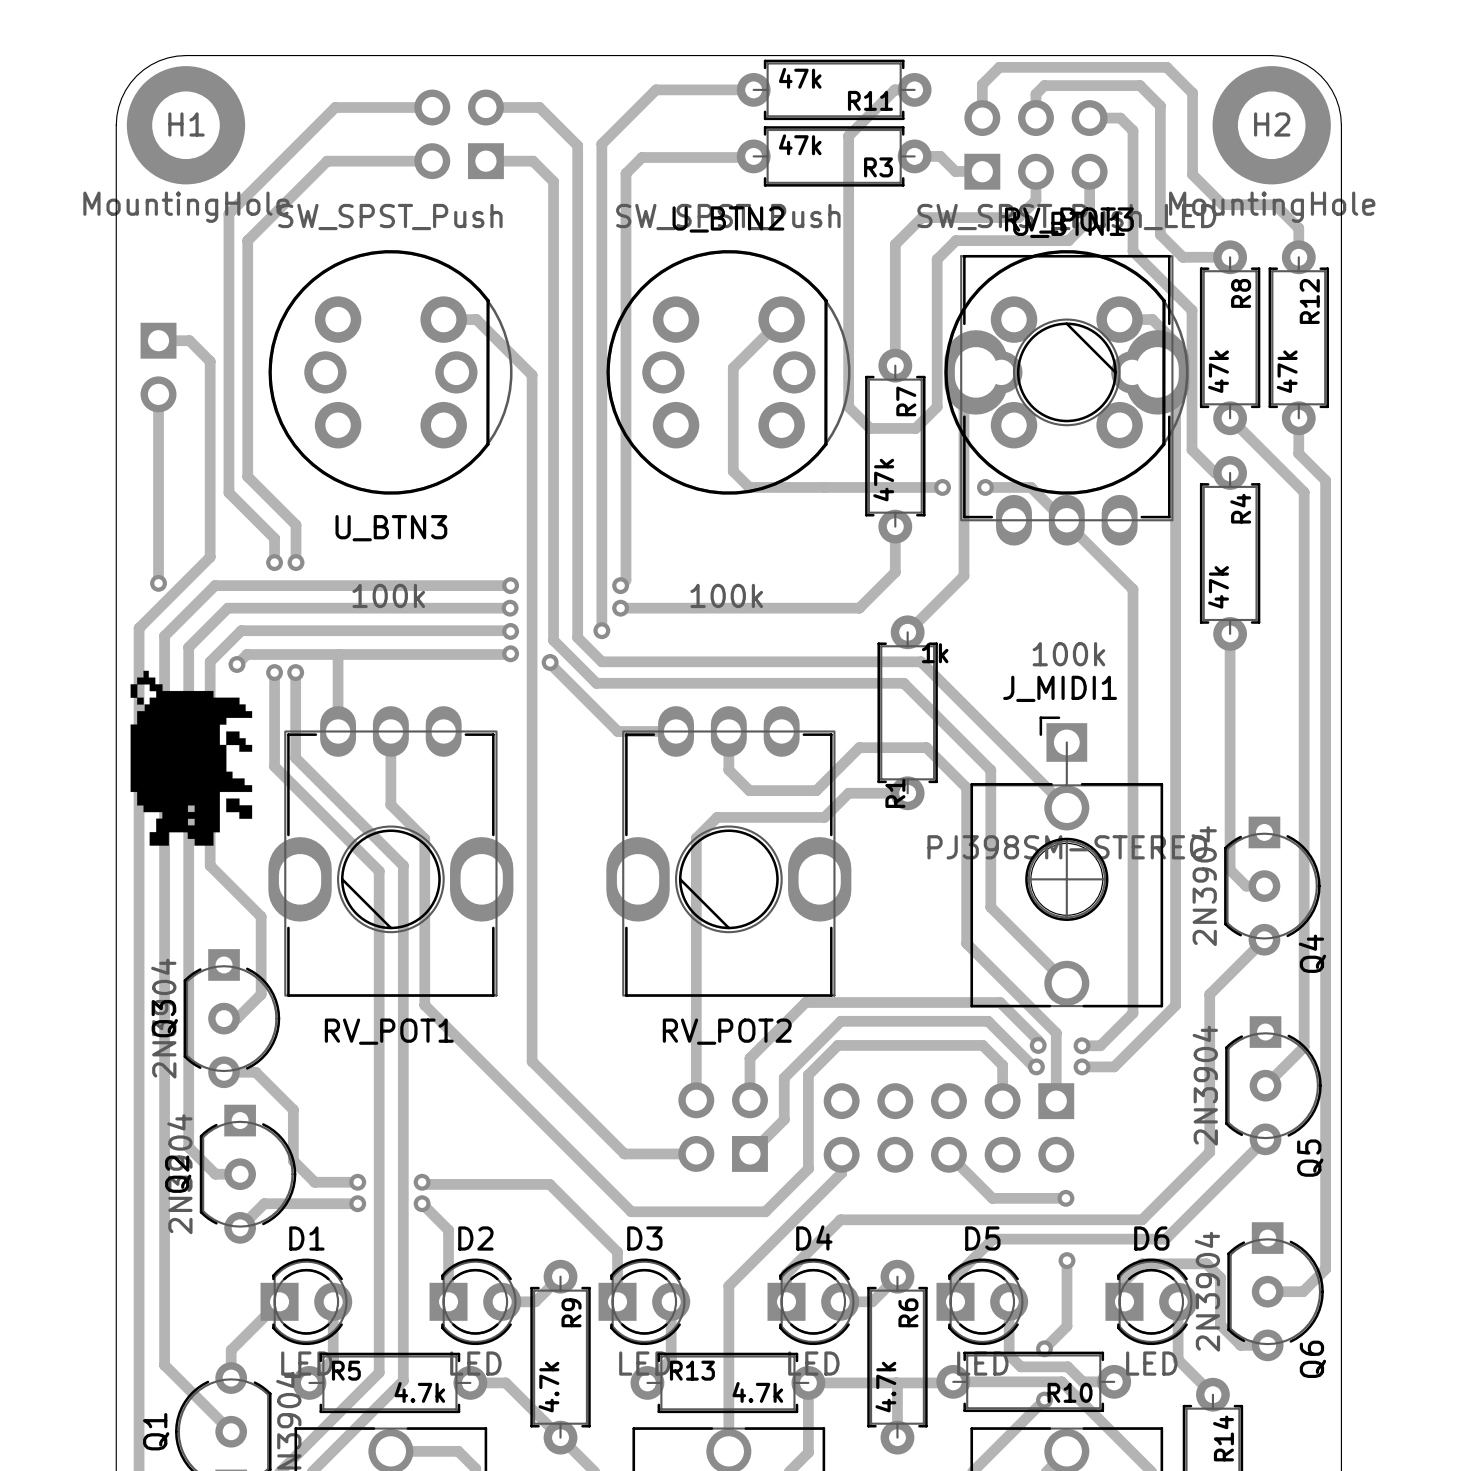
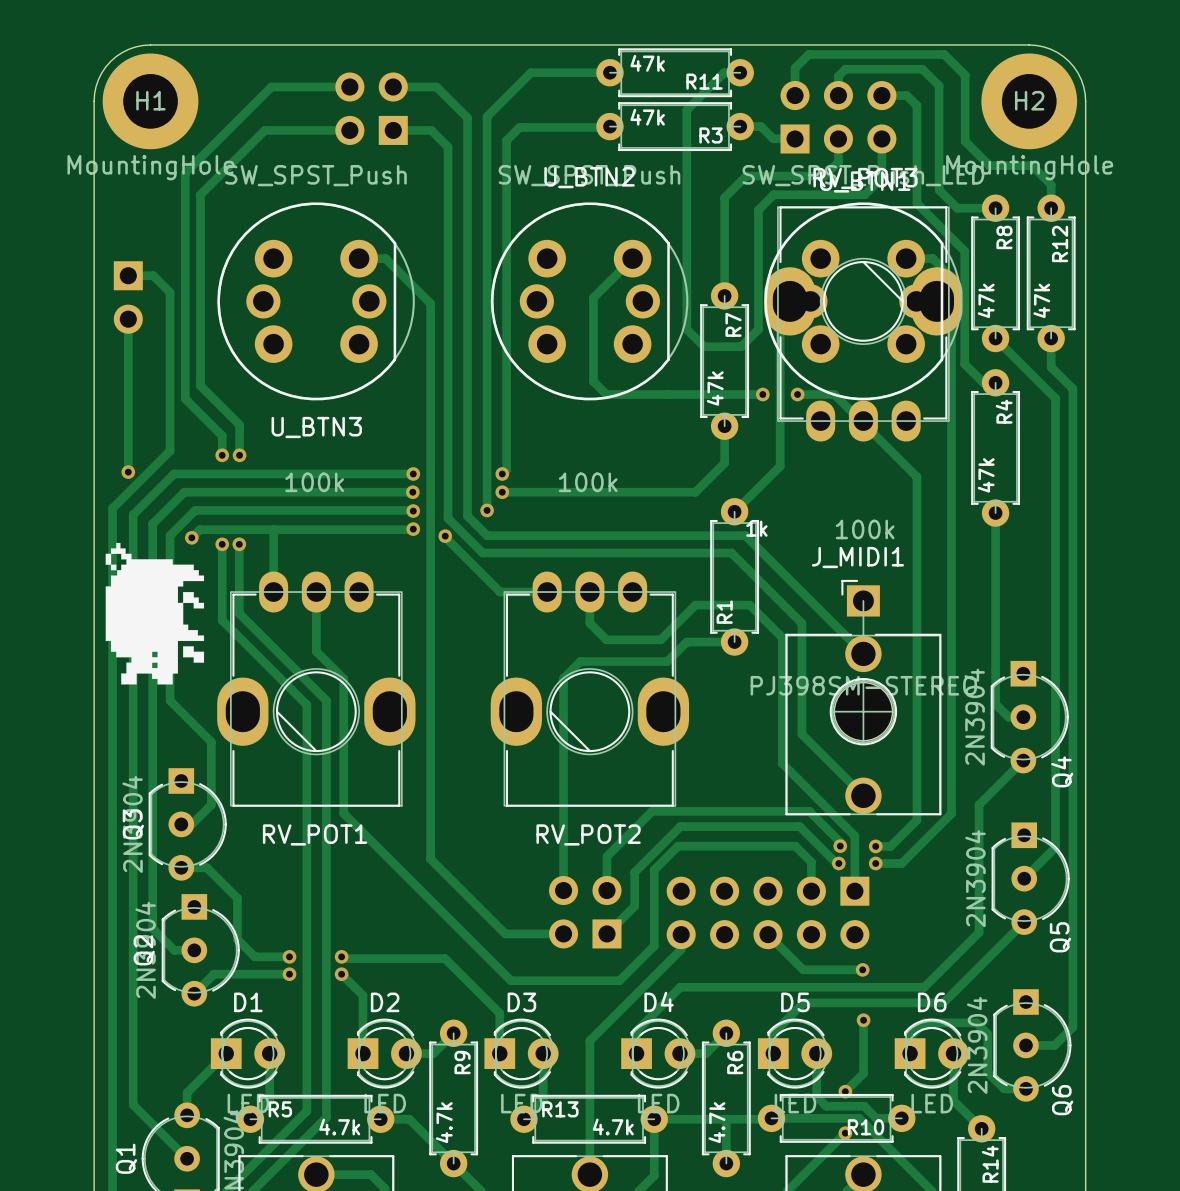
R1 name position: R1 (895, 793) -> R1 (724, 612)

